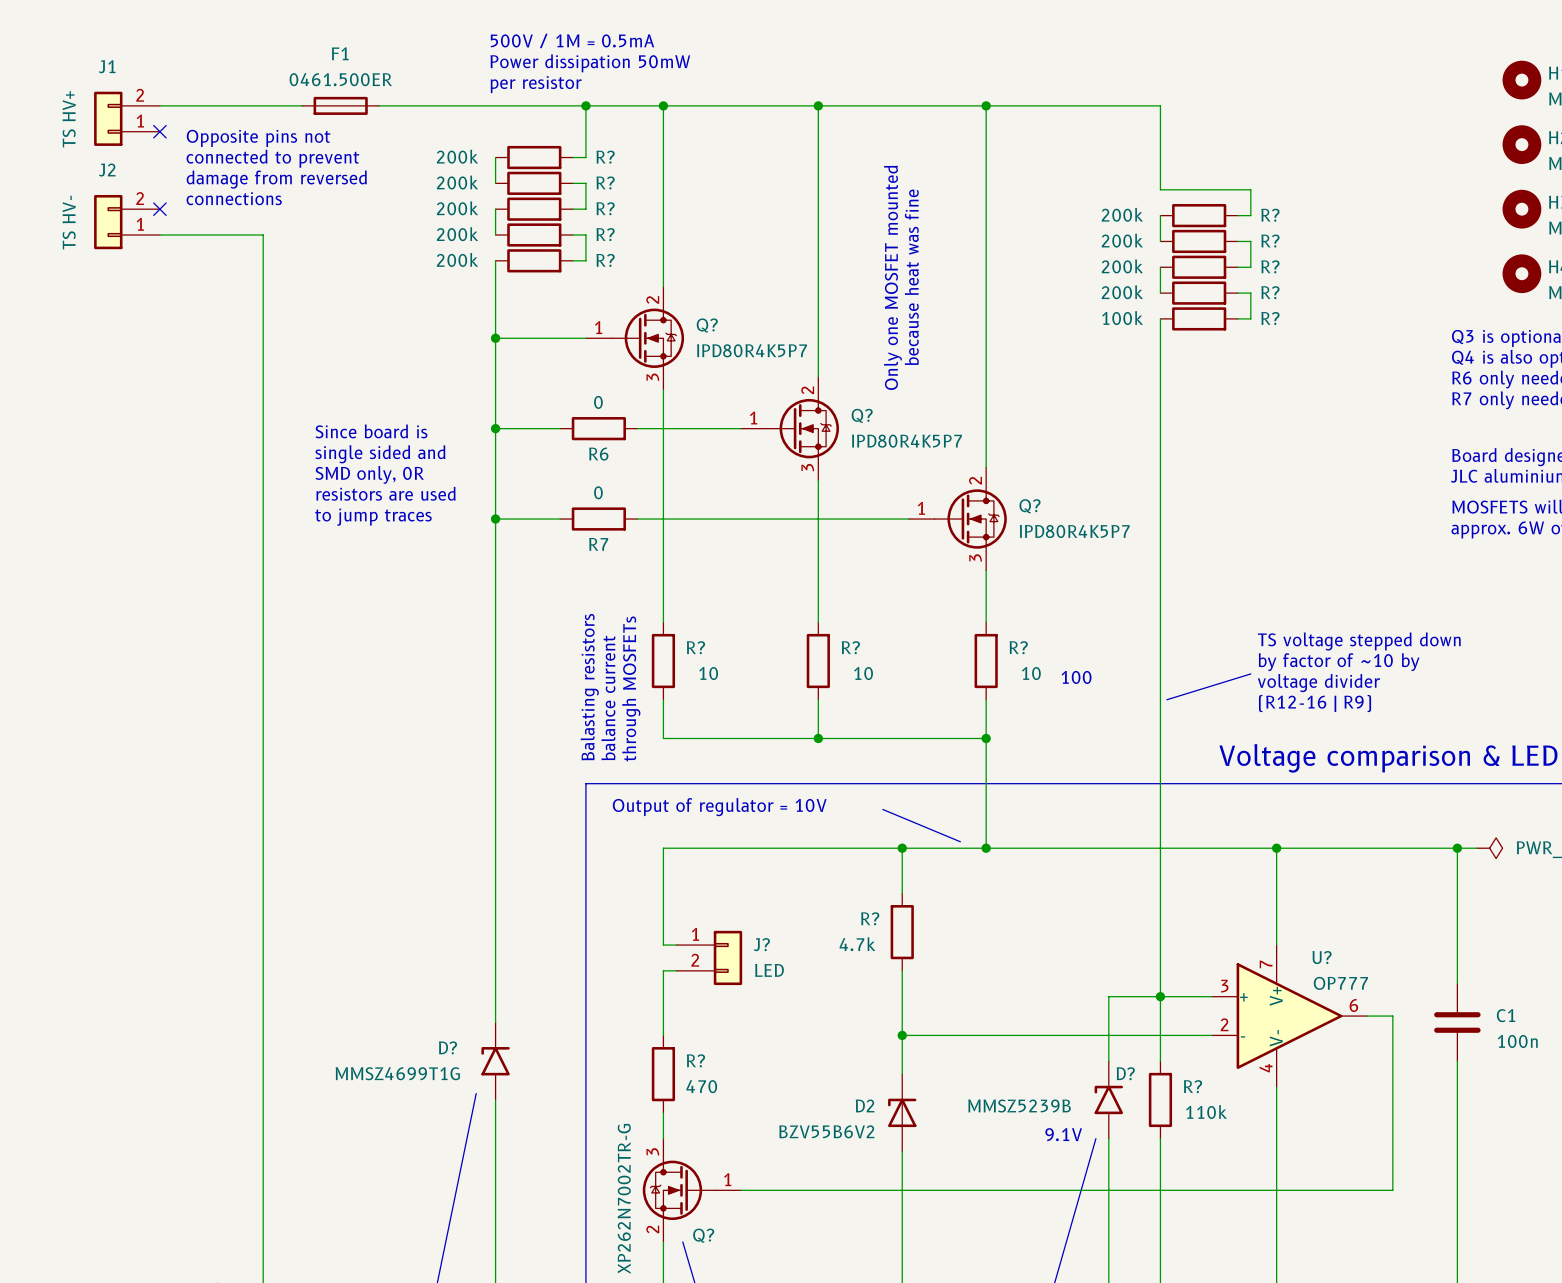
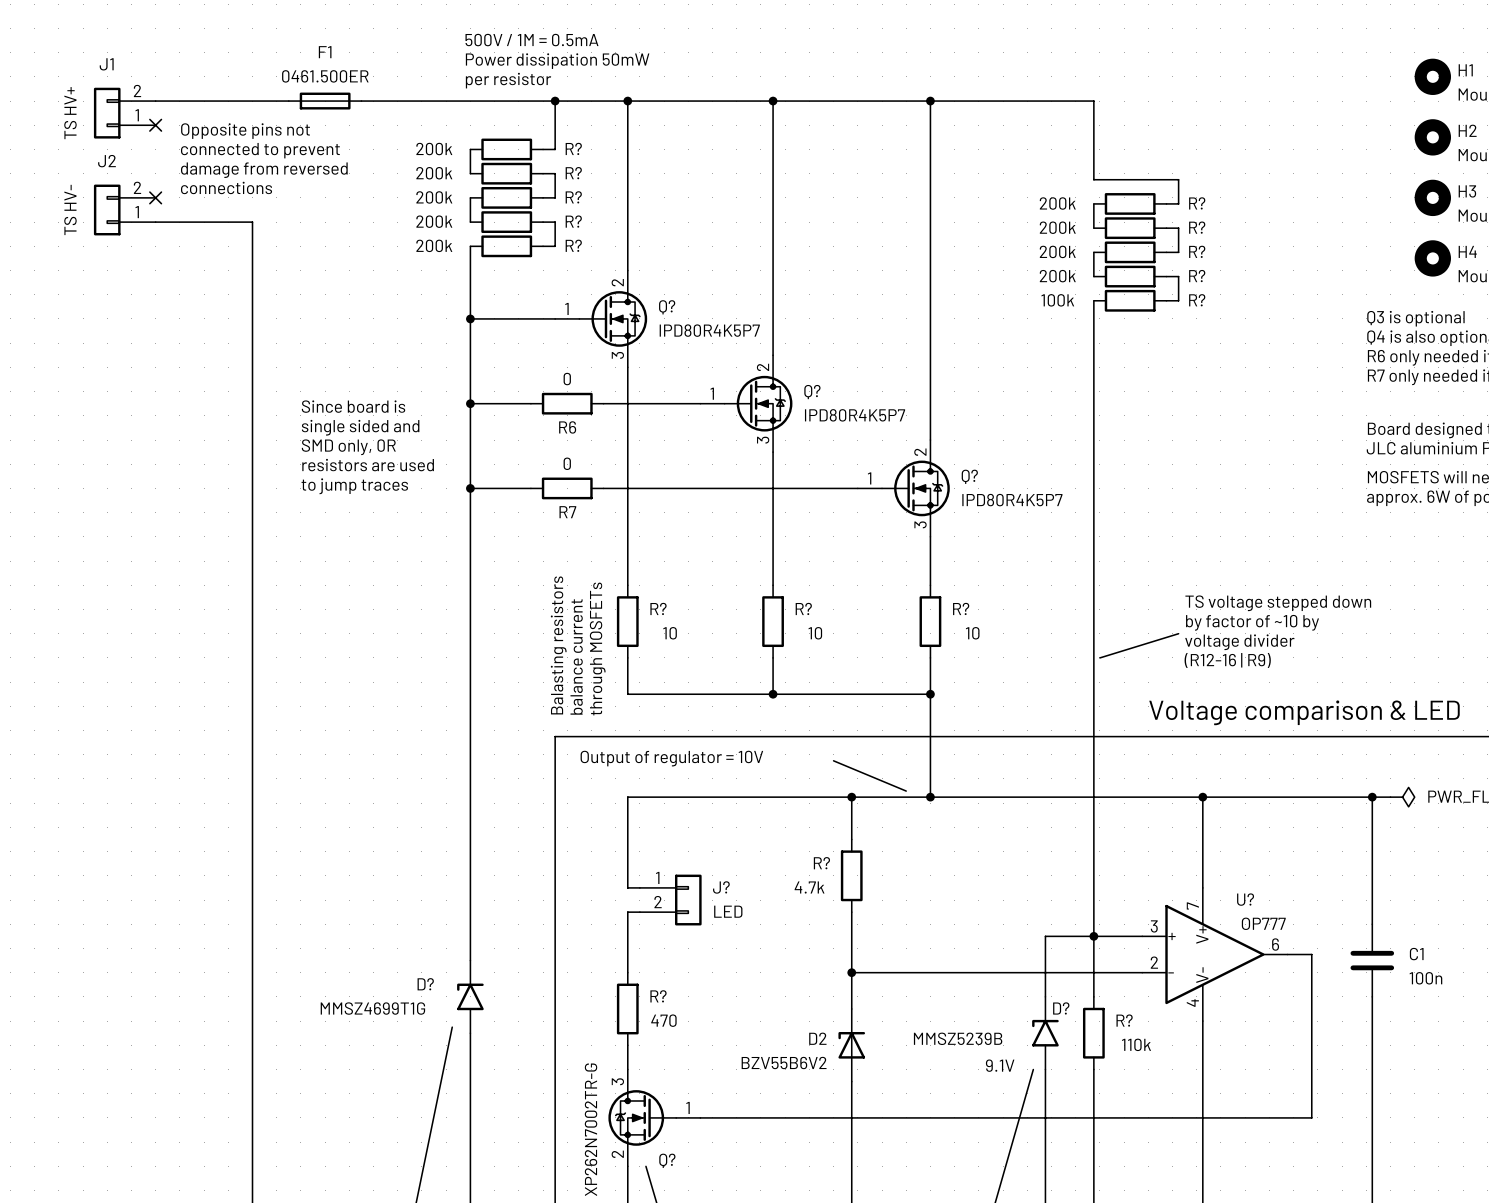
text: Only one MOSFET mounted (892, 277) -> none
text: because heat was fine (911, 277) -> none
text: 100 (1076, 677) -> none

